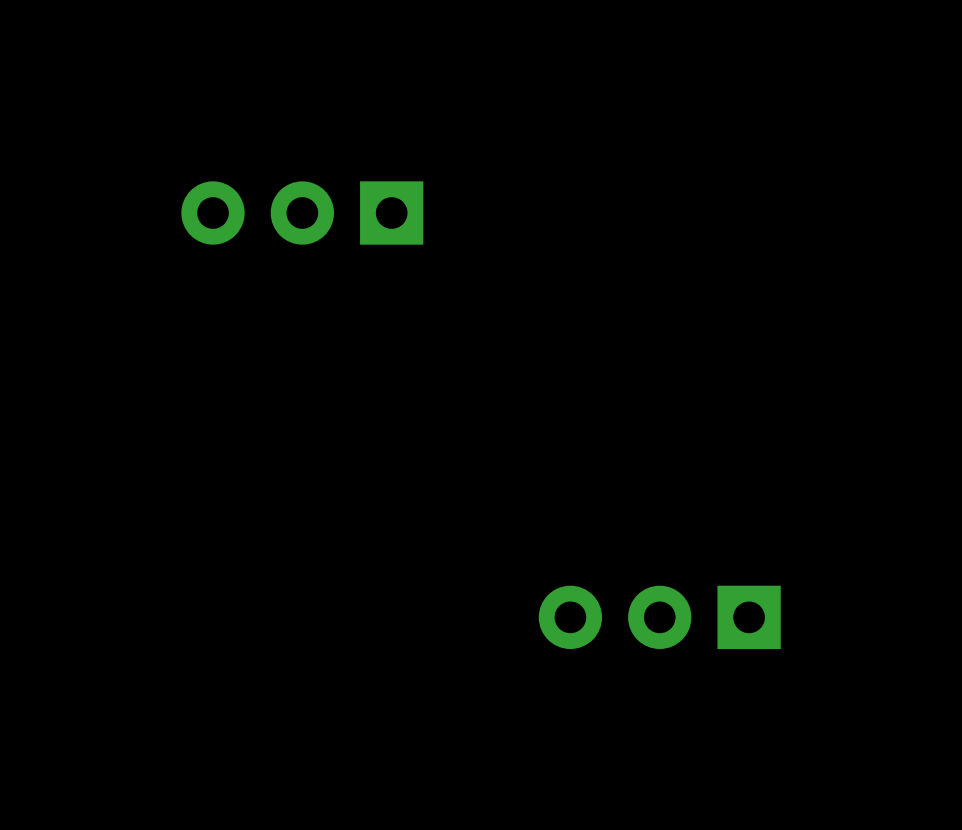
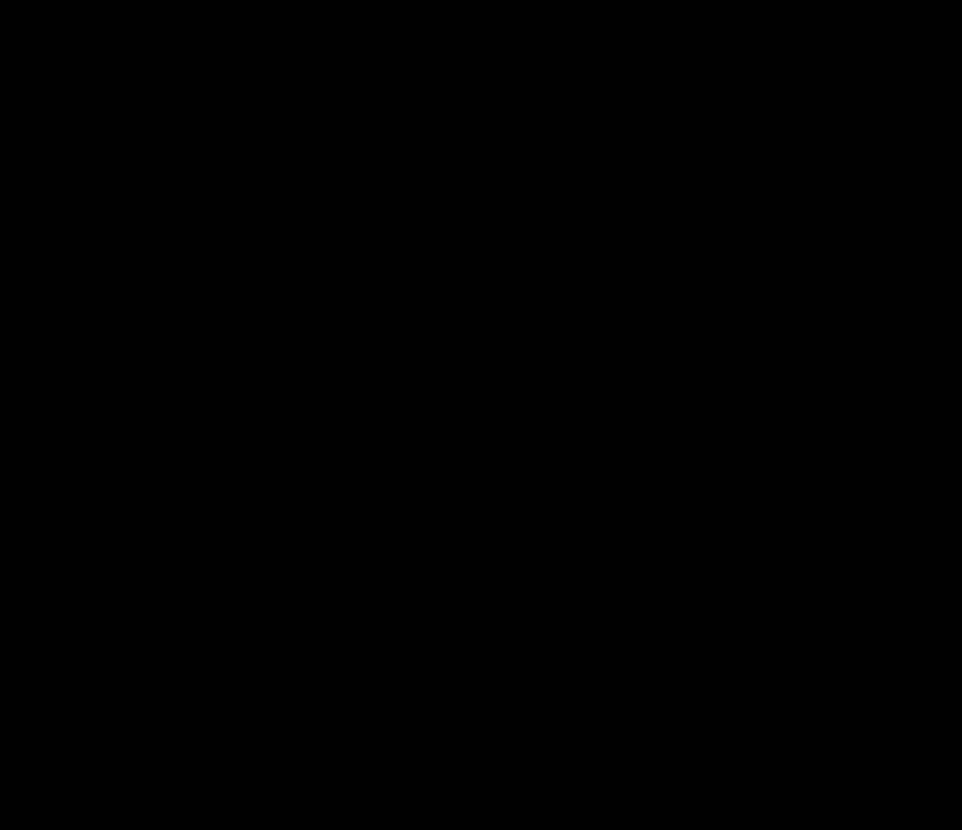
part: (302, 212) -> none
part: (659, 617) -> none

